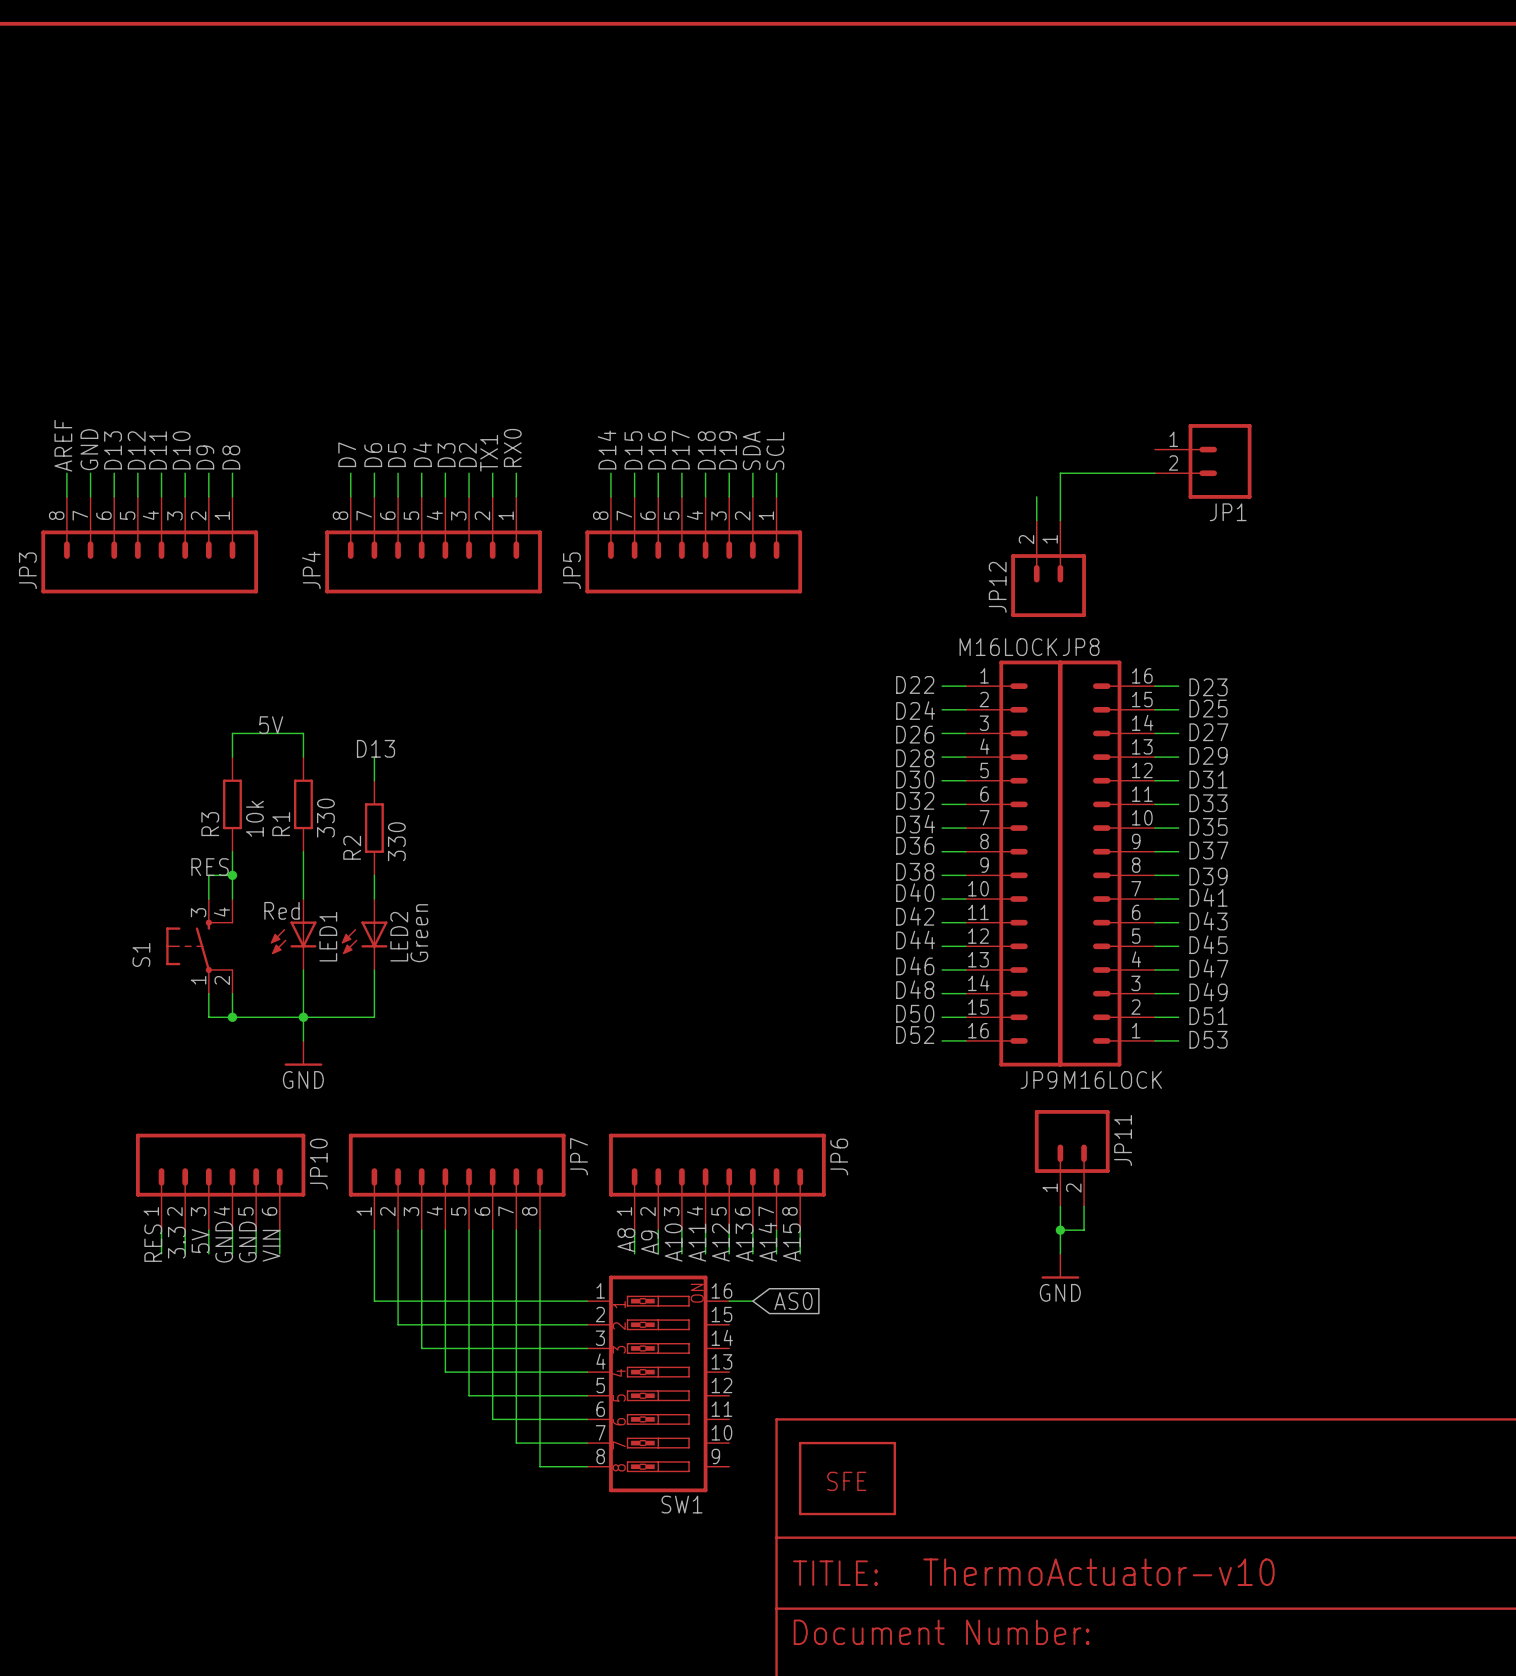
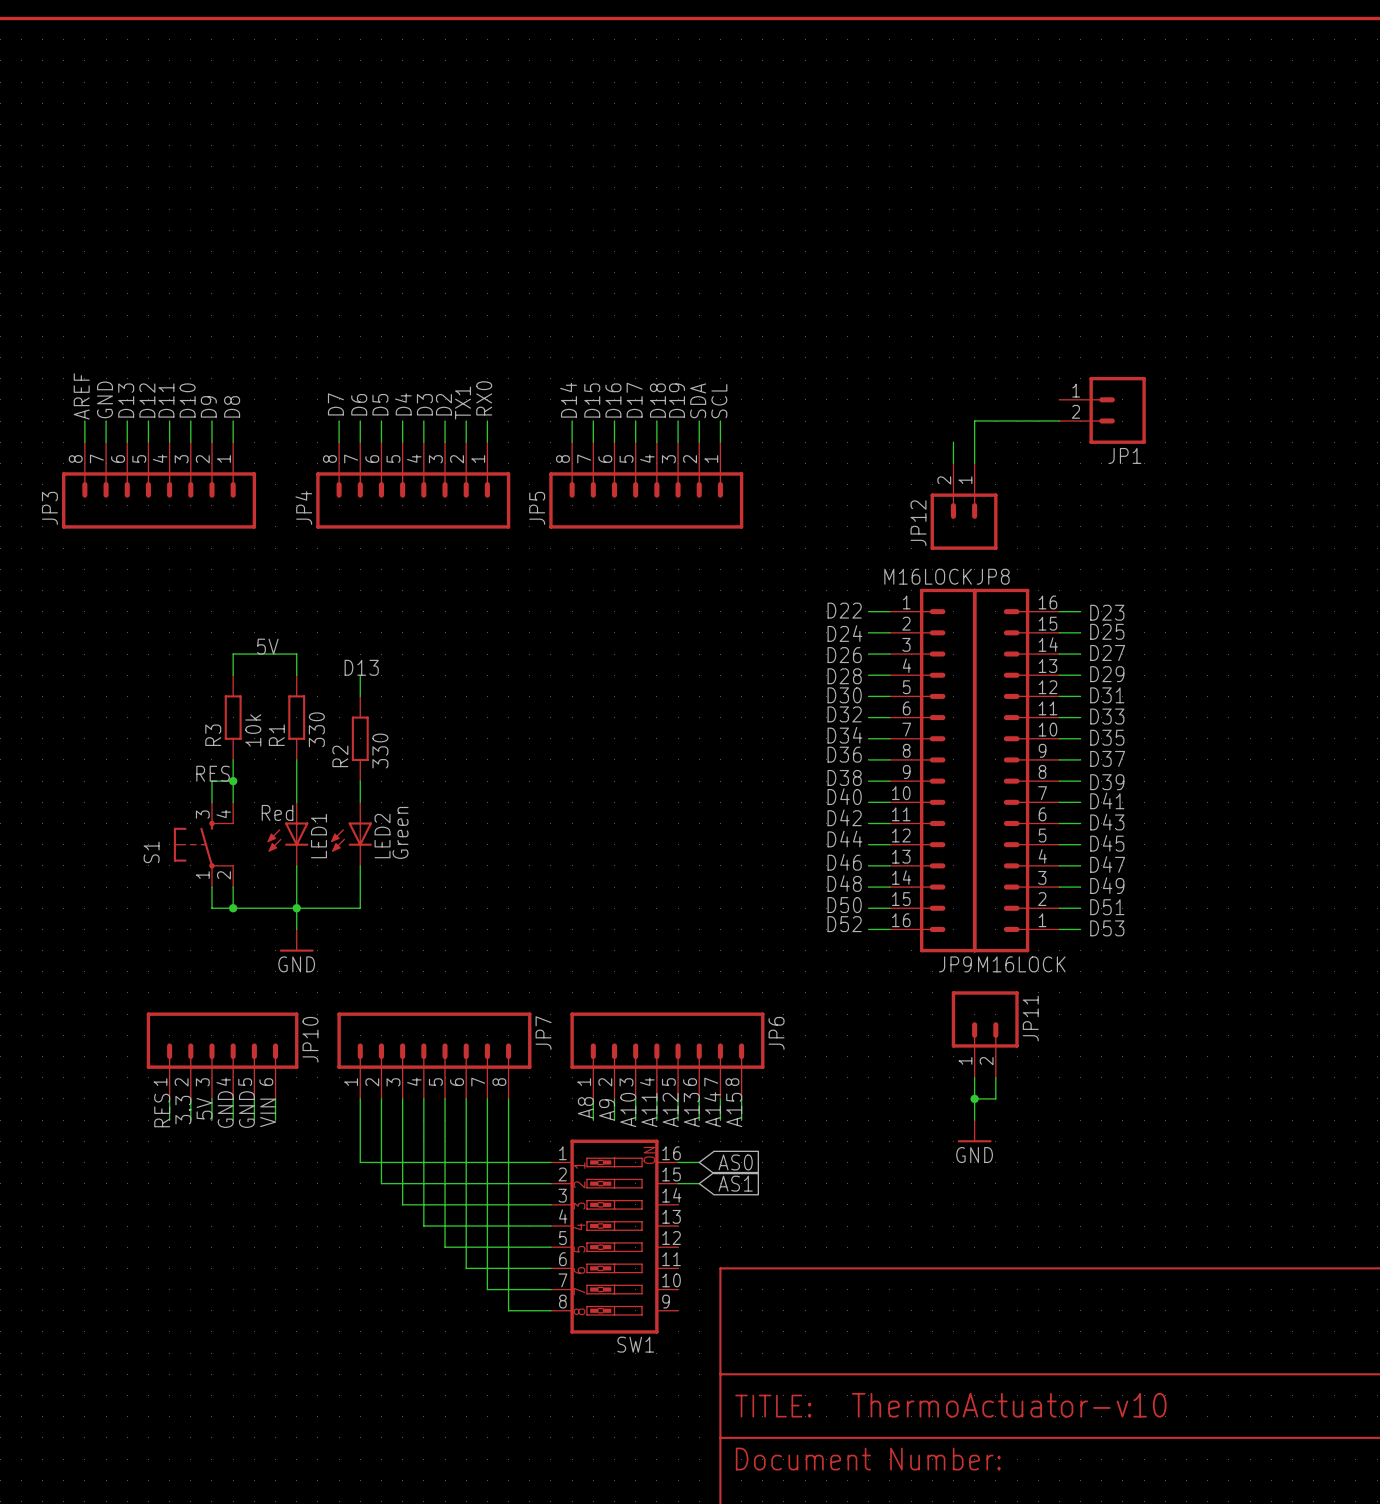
wire: none -> (678, 1183) (699, 1183)
global label: none -> AS1 (735, 1183)
part: (847, 1478) -> none

